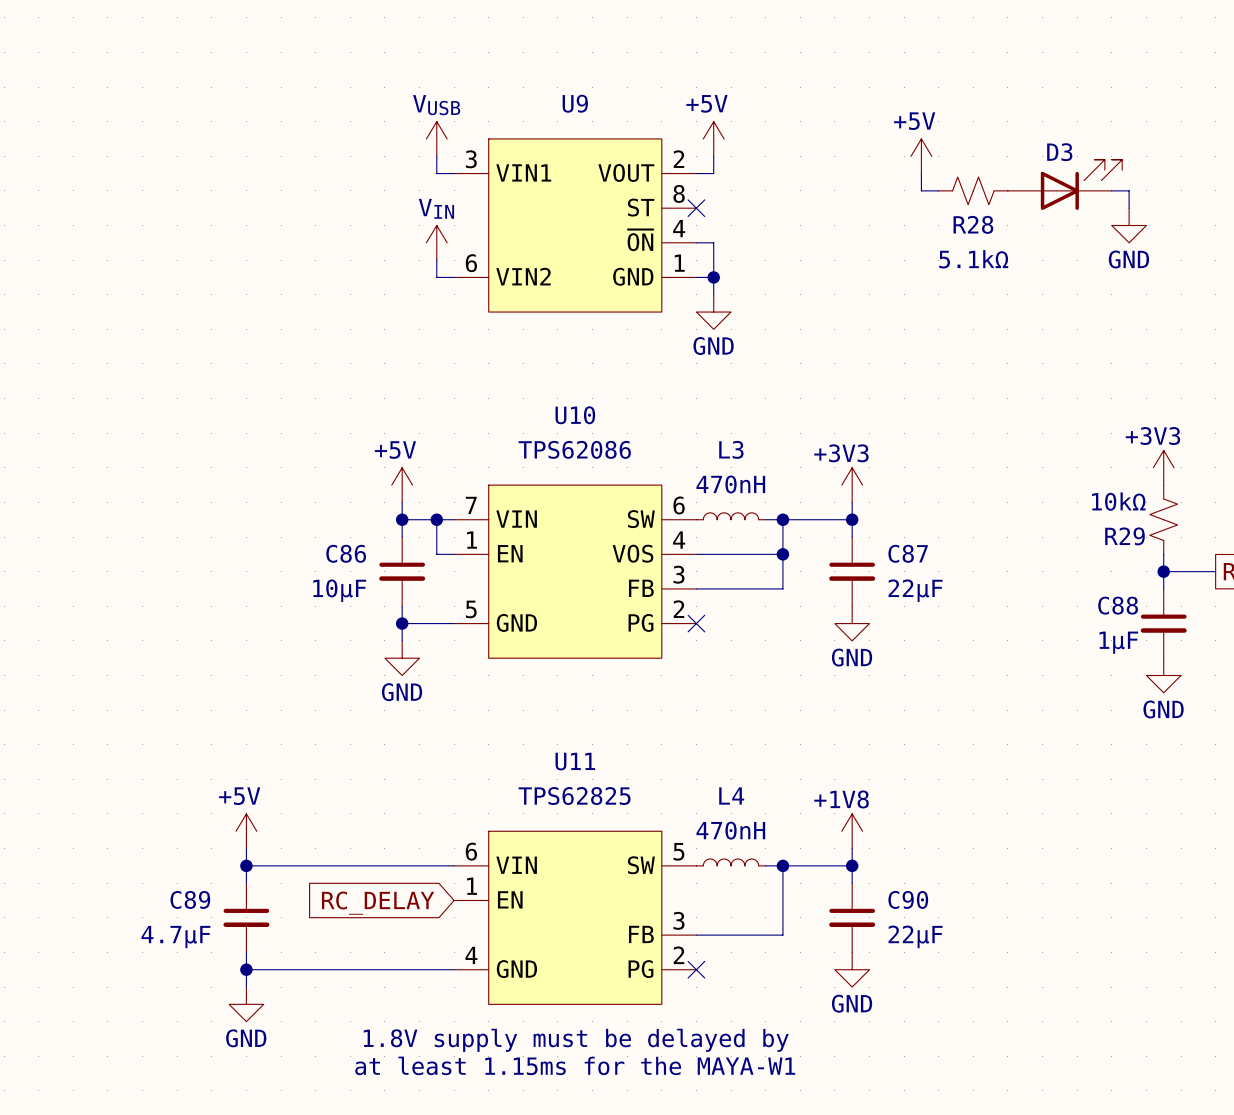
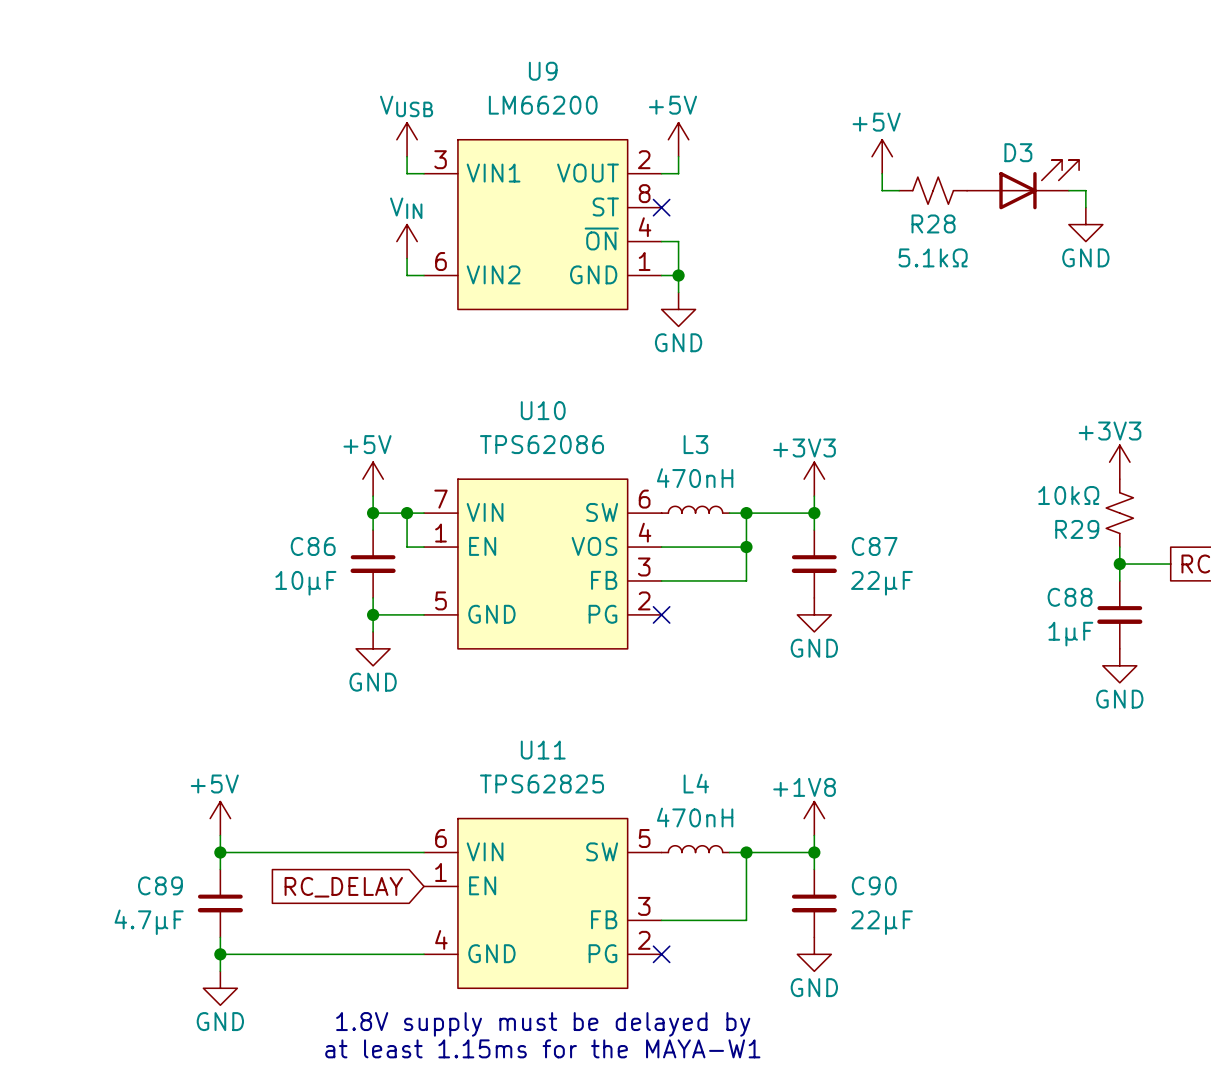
U9 name position: U9 (575, 103) -> U9 (543, 71)
U9 value: none -> LM66200 (543, 105)

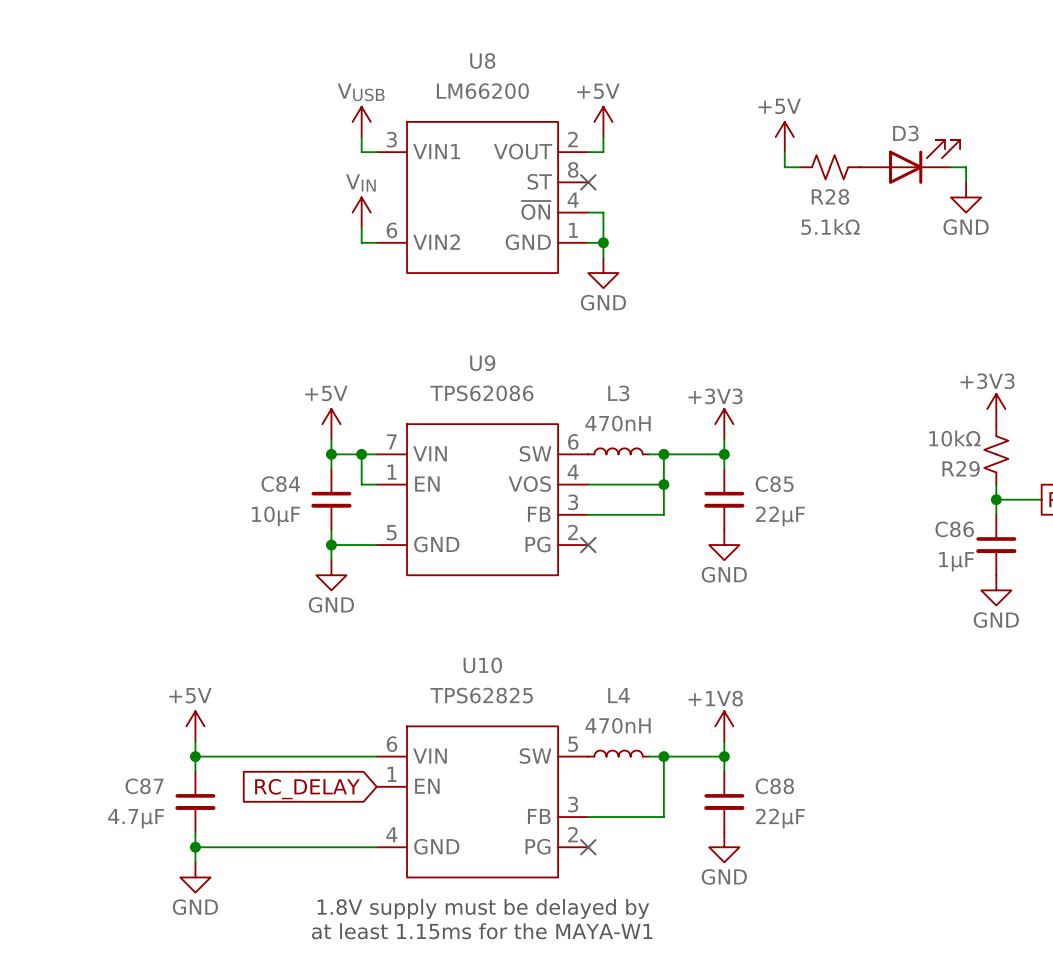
U9 name: U9 (543, 71) -> U8 (482, 60)
U10 name: U10 (543, 410) -> U9 (482, 363)
C86 name: C86 (313, 546) -> C84 (280, 484)
C87 name: C87 (874, 546) -> C85 (774, 484)
C88 name: C88 (1070, 597) -> C86 (954, 529)
U11 name: U11 (543, 750) -> U10 (482, 665)
C89 name: C89 (160, 885) -> C87 (144, 786)
C90 name: C90 (874, 885) -> C88 (774, 786)

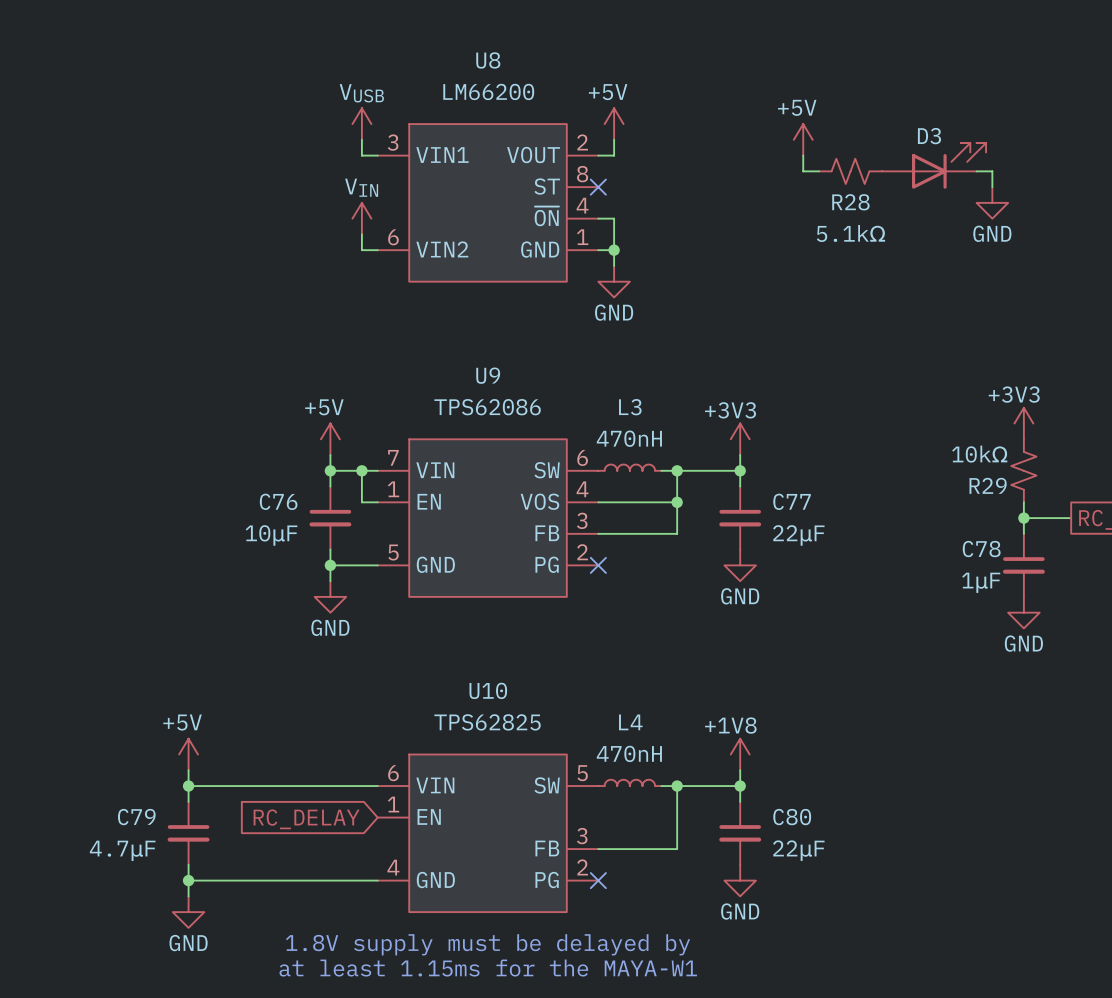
C84 name: C84 (280, 484) -> C76 (278, 501)
C85 name: C85 (774, 484) -> C77 (792, 501)
C86 name: C86 (954, 529) -> C78 (981, 549)
C87 name: C87 (144, 786) -> C79 (136, 817)
C88 name: C88 (774, 786) -> C80 (792, 817)

